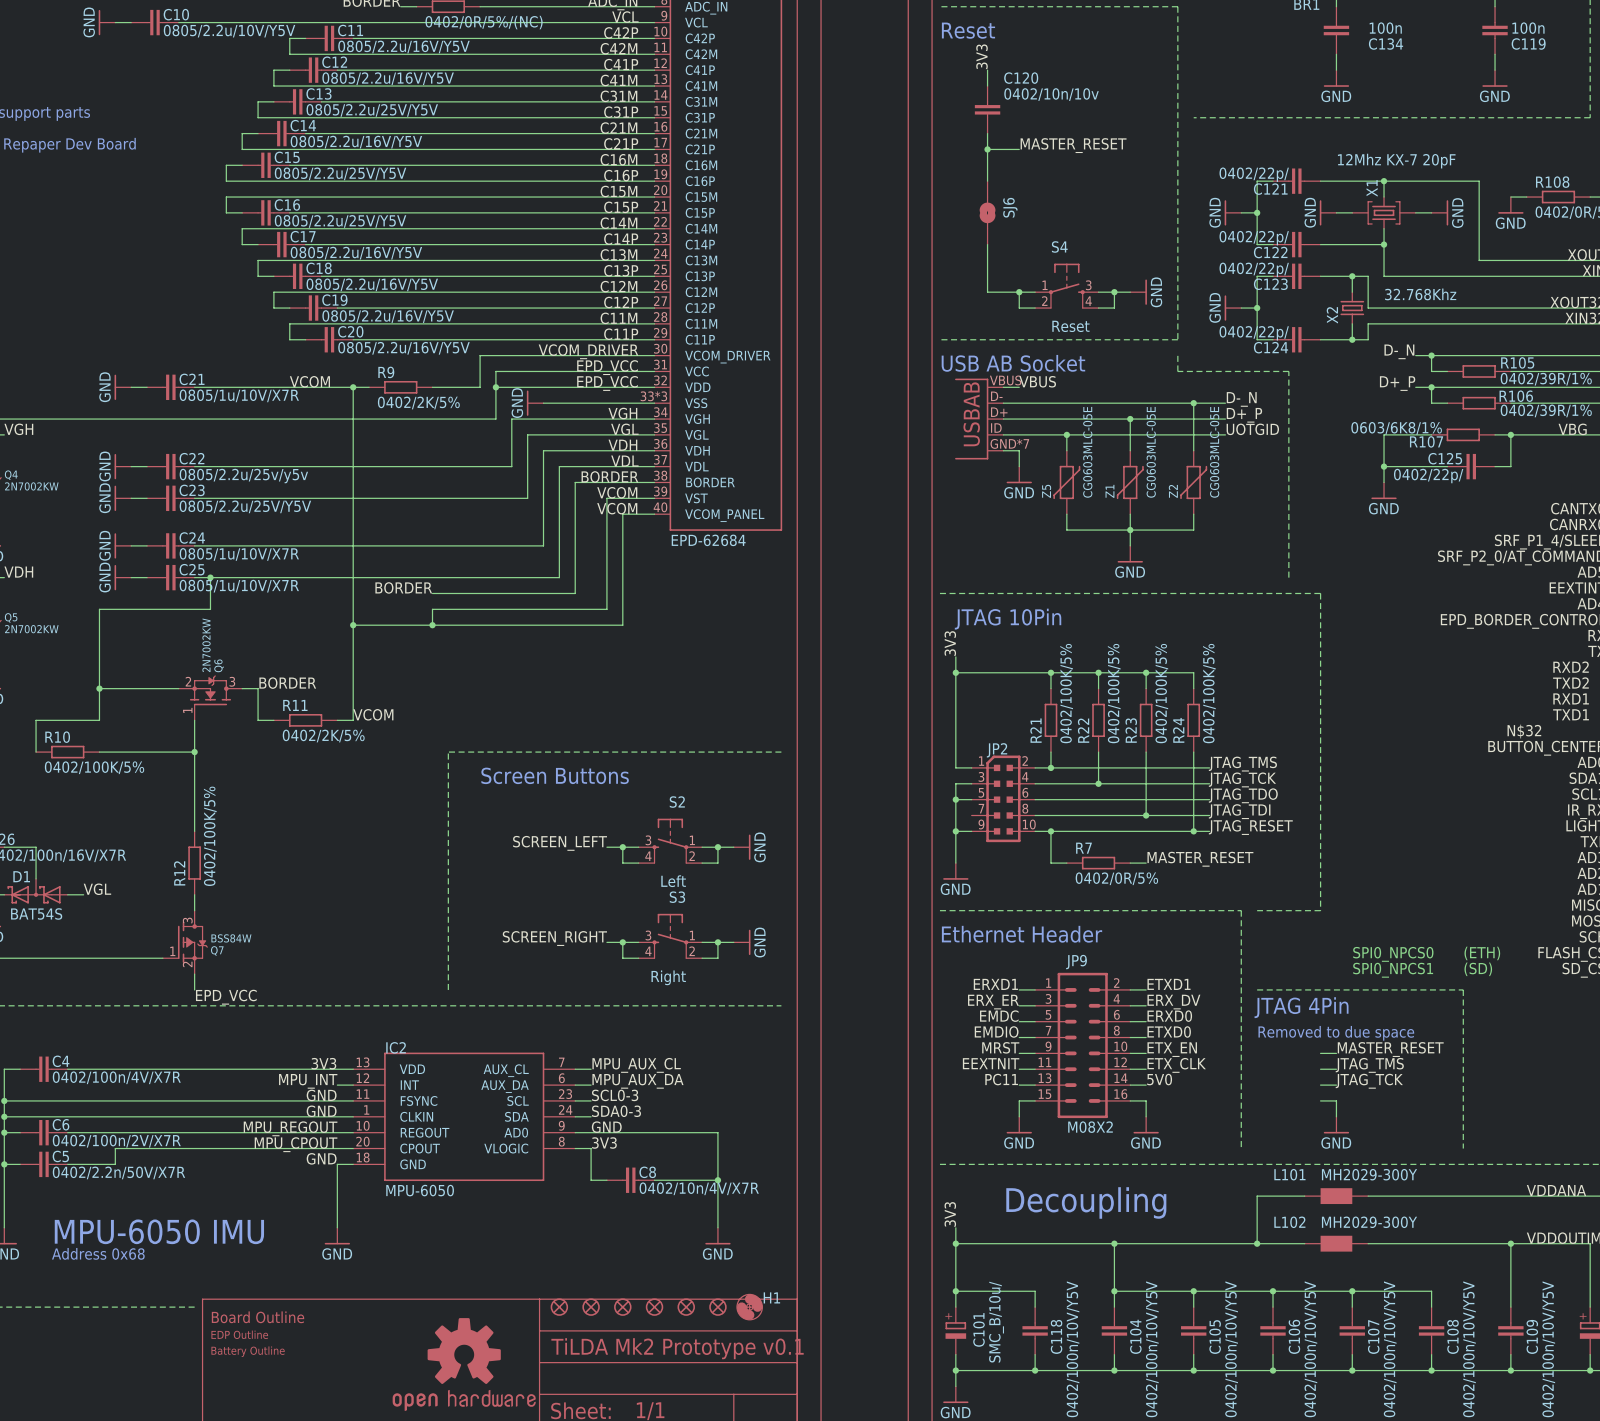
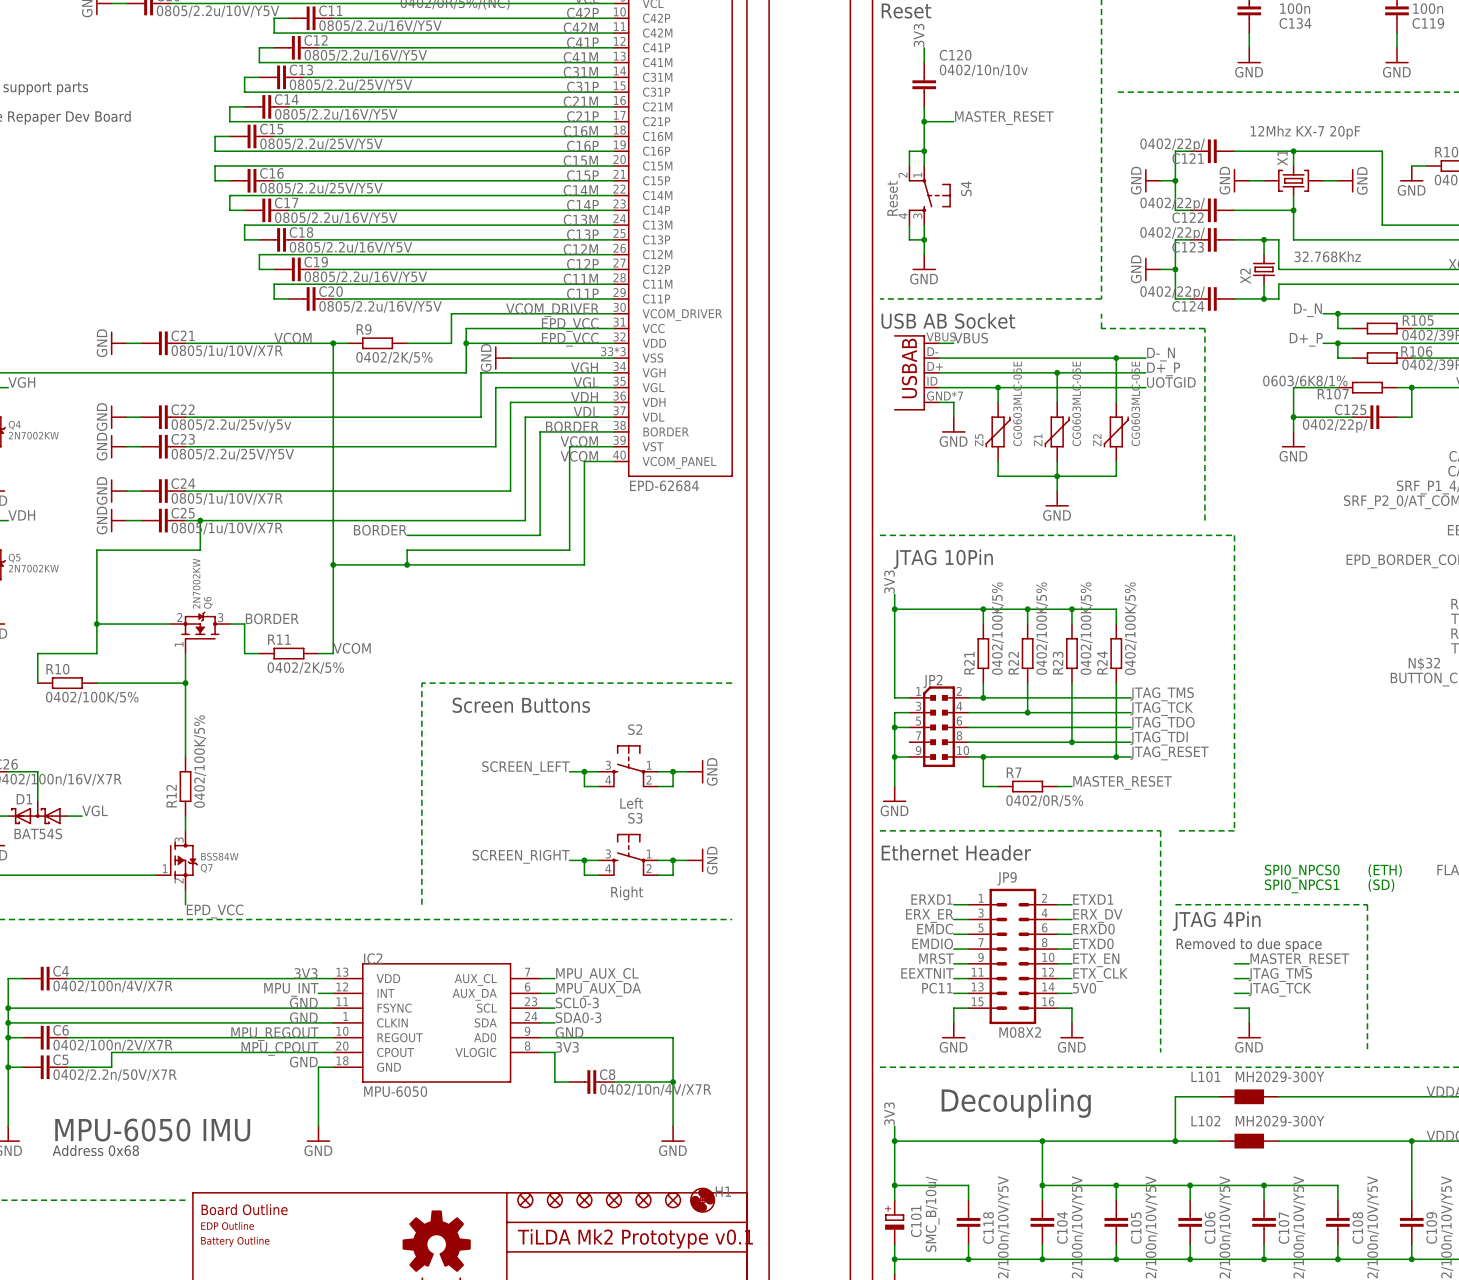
junction: none -> (924, 151)
wire: none -> (909, 166) (909, 151) (924, 151) (924, 166)
SJ6: (987, 212) -> none
S4 rotation: 0° (1066, 286) -> 90° clockwise (929, 195)
S4 position: (1066, 286) -> (929, 195)
wire: (987, 292) (1035, 292) -> none
wire: (1019, 292) (1019, 308) (1035, 308) -> (909, 225) (909, 239) (924, 239)
junction position: (1019, 292) -> (924, 239)
wire: (1098, 292) (1130, 292) -> none
wire: (1114, 292) (1114, 308) (1098, 308) -> none
junction: (1114, 292) -> none
power symbol position: GND (1138, 292) -> GND (924, 262)
power symbol rotation: 0° (1146, 292) -> 90° clockwise (924, 269)

